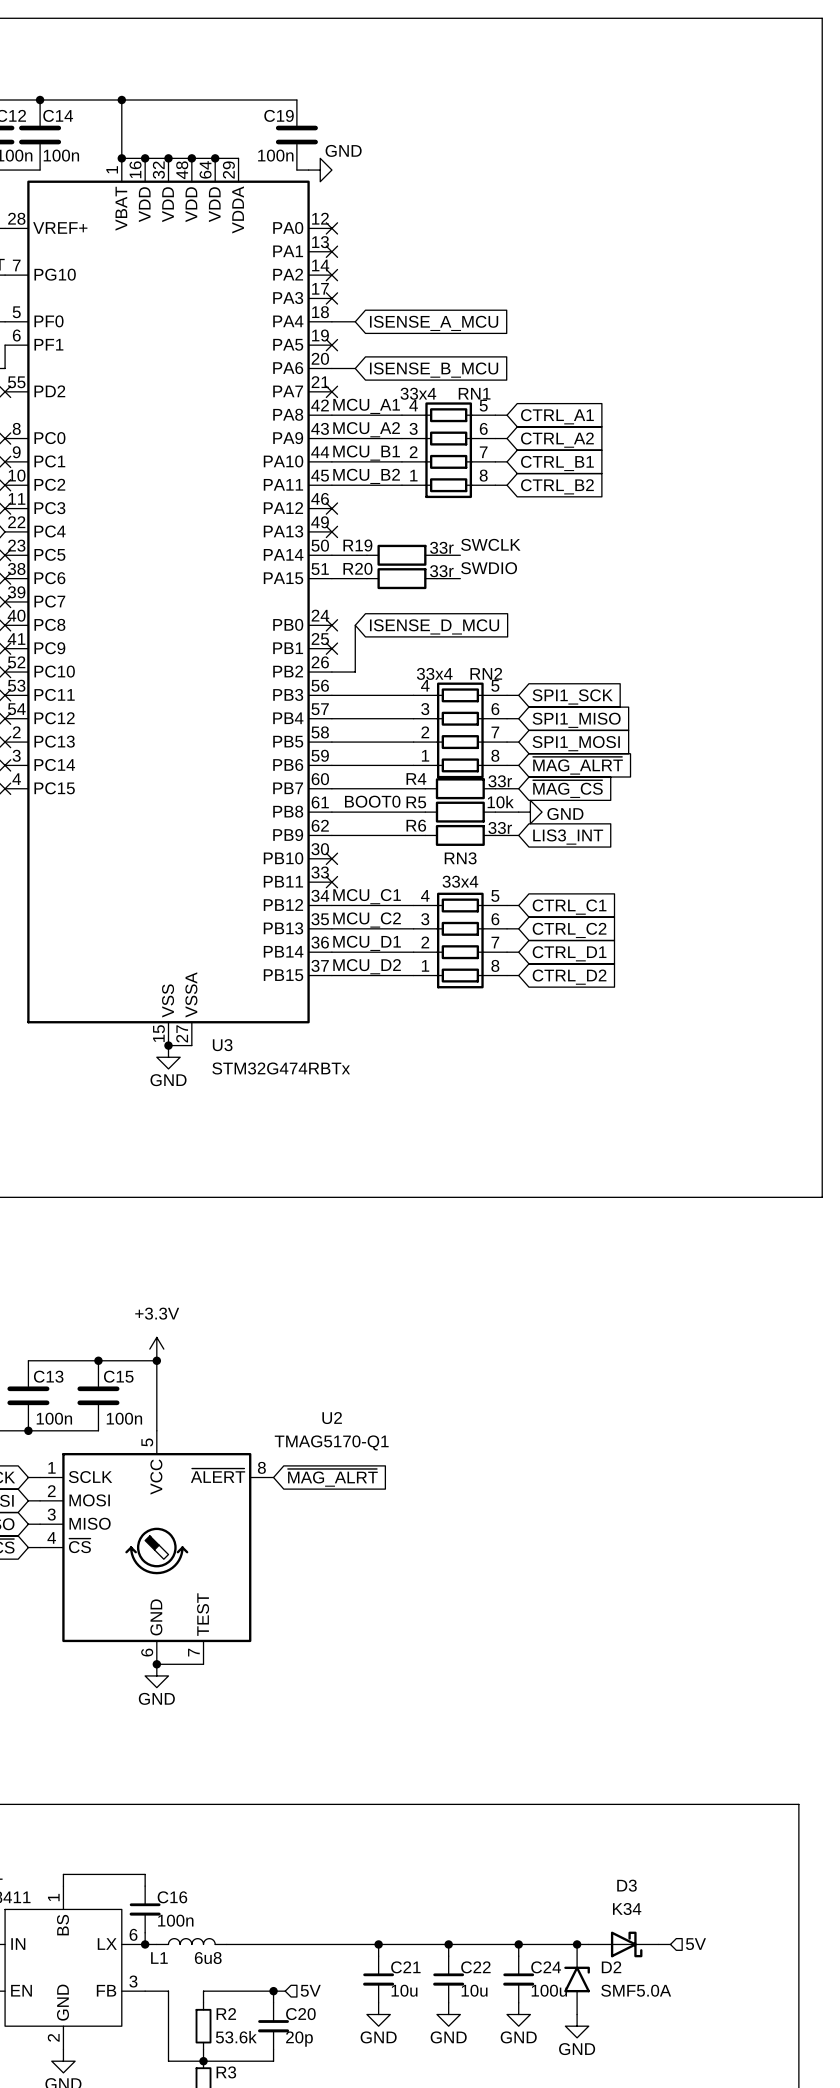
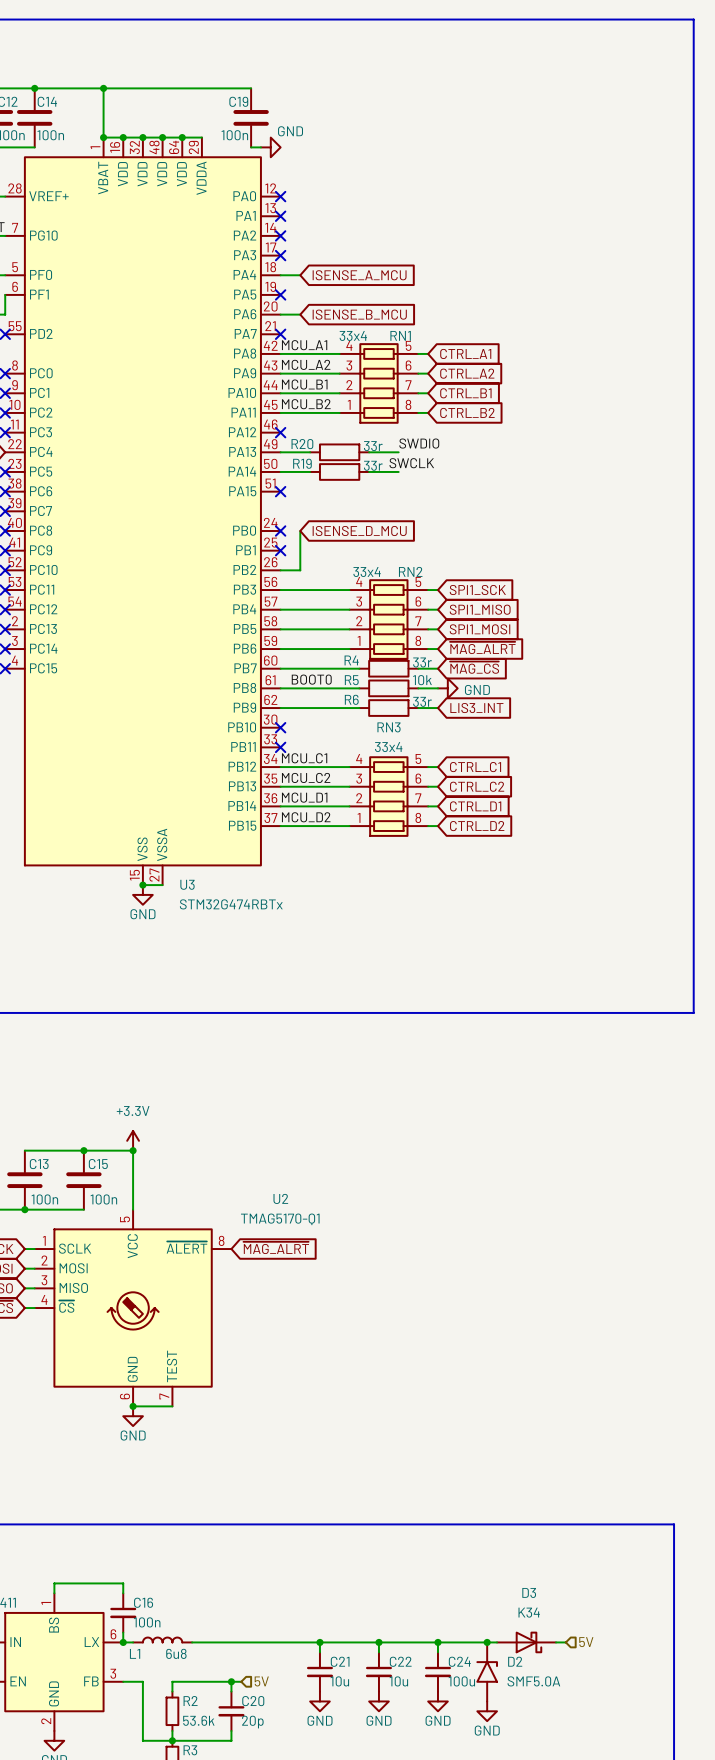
no-connect mark position: (331, 531) -> (280, 491)
wire: none -> (369, 452) (398, 452)
wire: none -> (388, 471) (398, 471)
label position: SWDIO (489, 568) -> SWDIO (419, 443)
wire: (331, 578) (366, 578) -> (280, 452) (310, 452)
R20 position: (401, 578) -> (339, 452)
wire: (436, 578) (460, 578) -> none

